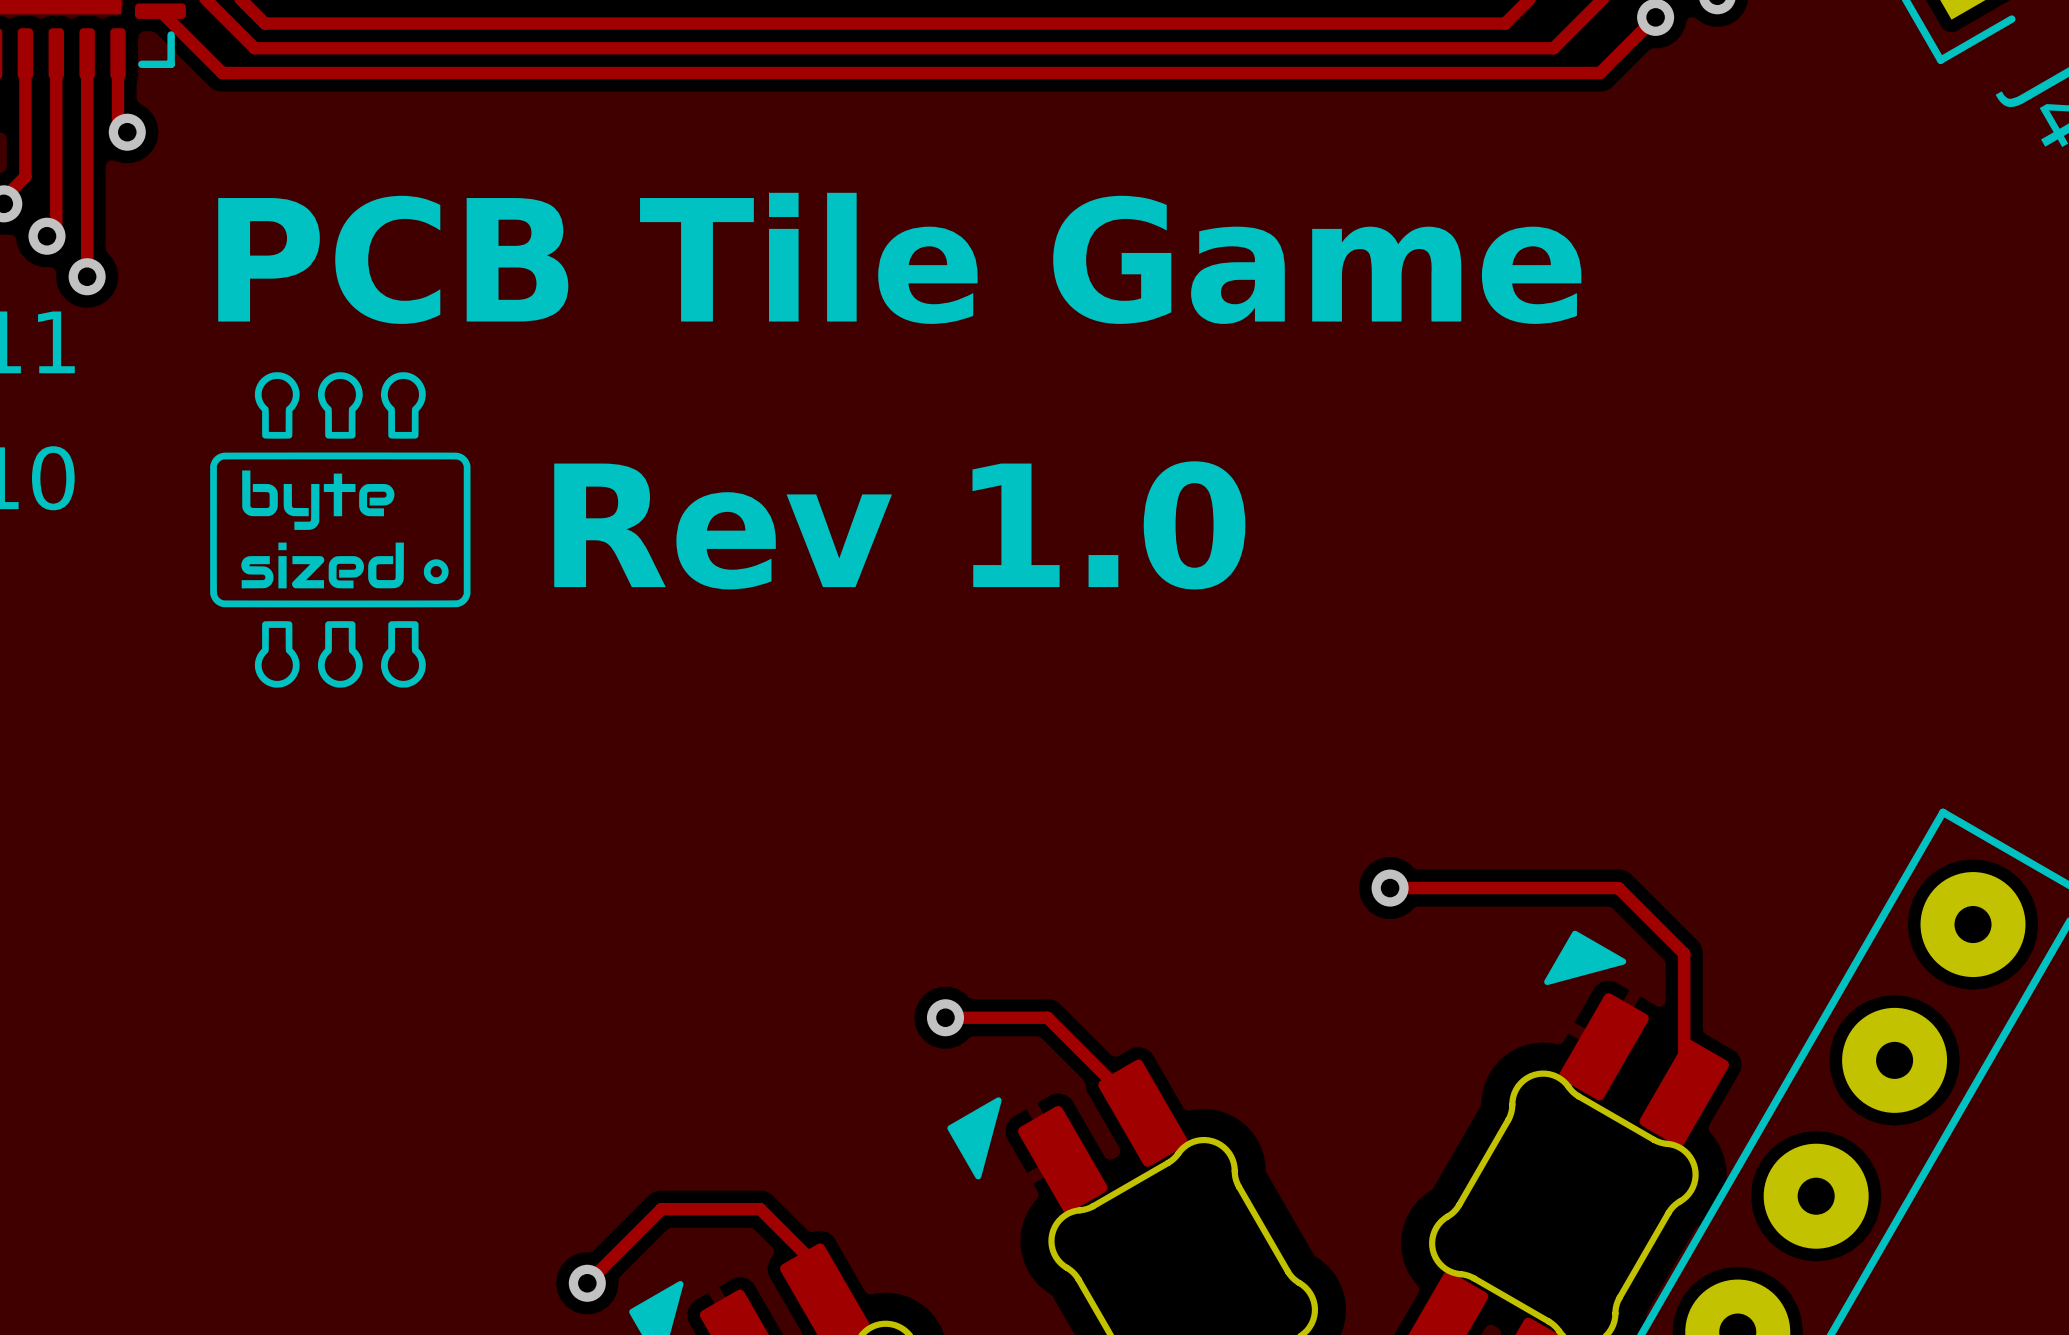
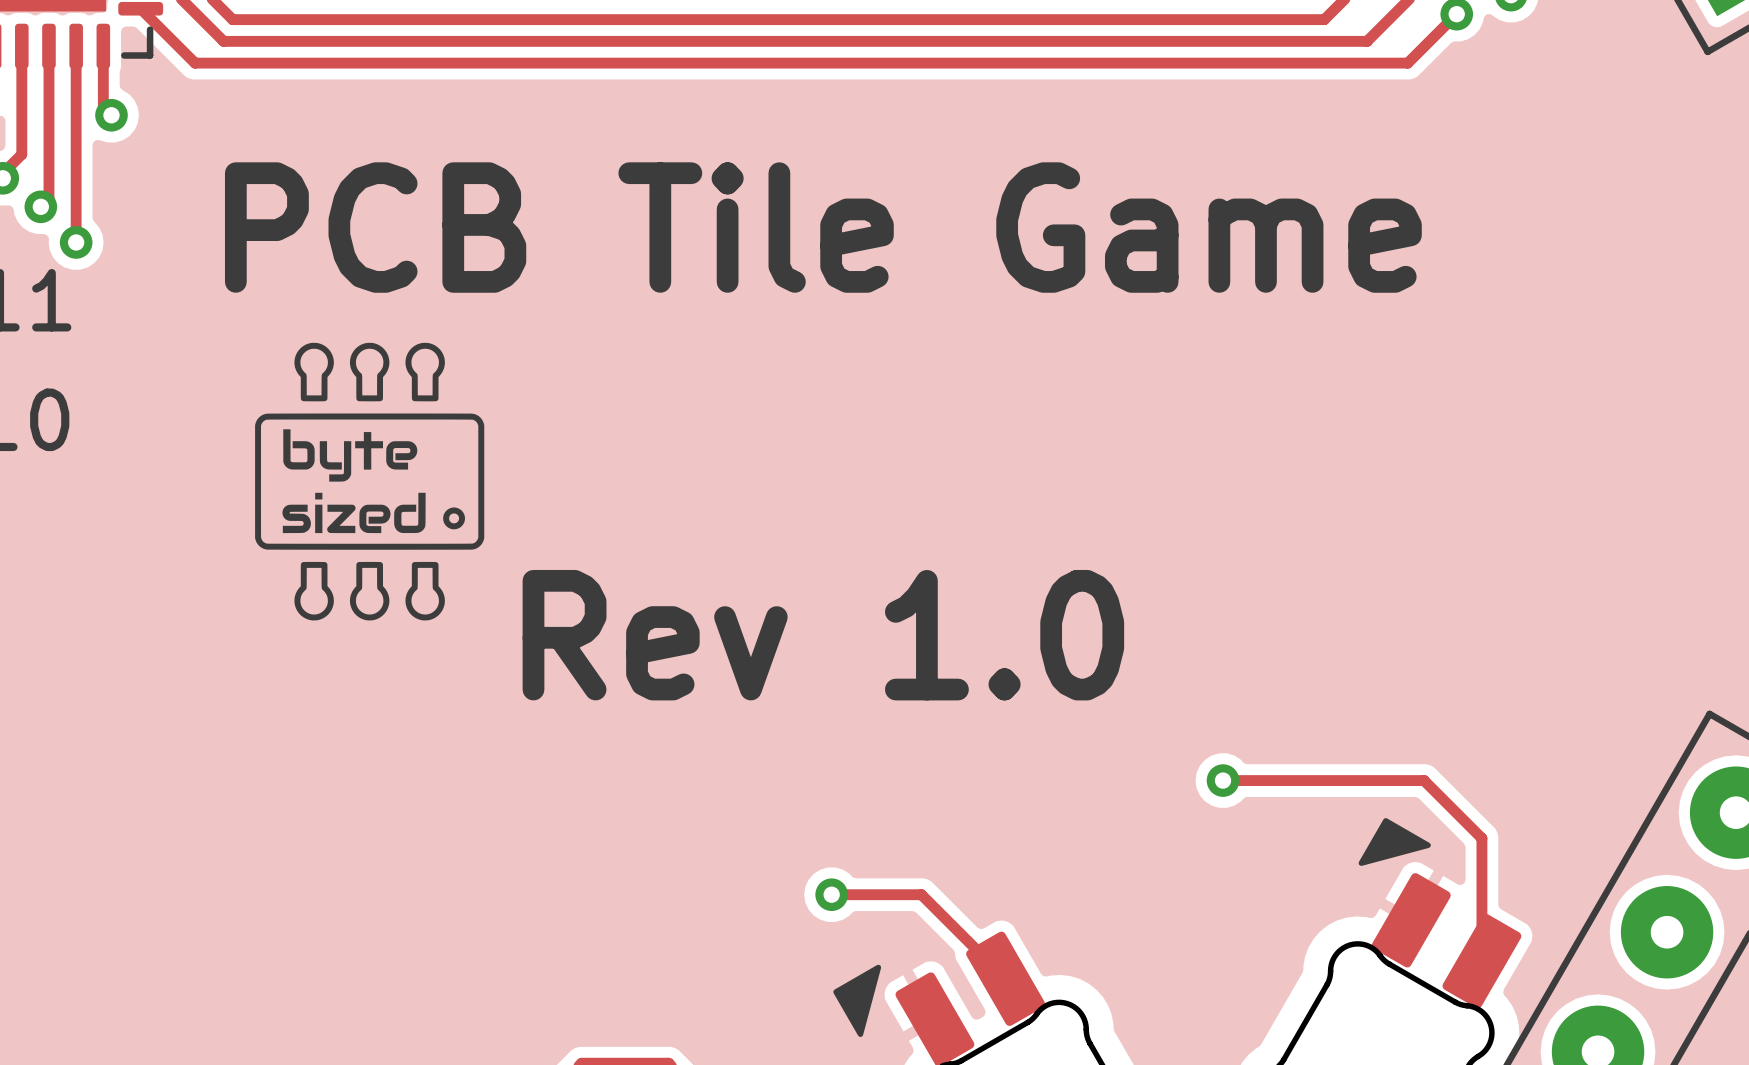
text position: PCB Tile Game (899, 258) -> PCB Tile Game (823, 227)
text position: Rev 1.0 (899, 525) -> Rev 1.0 (823, 635)
drawing position: (340, 529) -> (369, 481)

